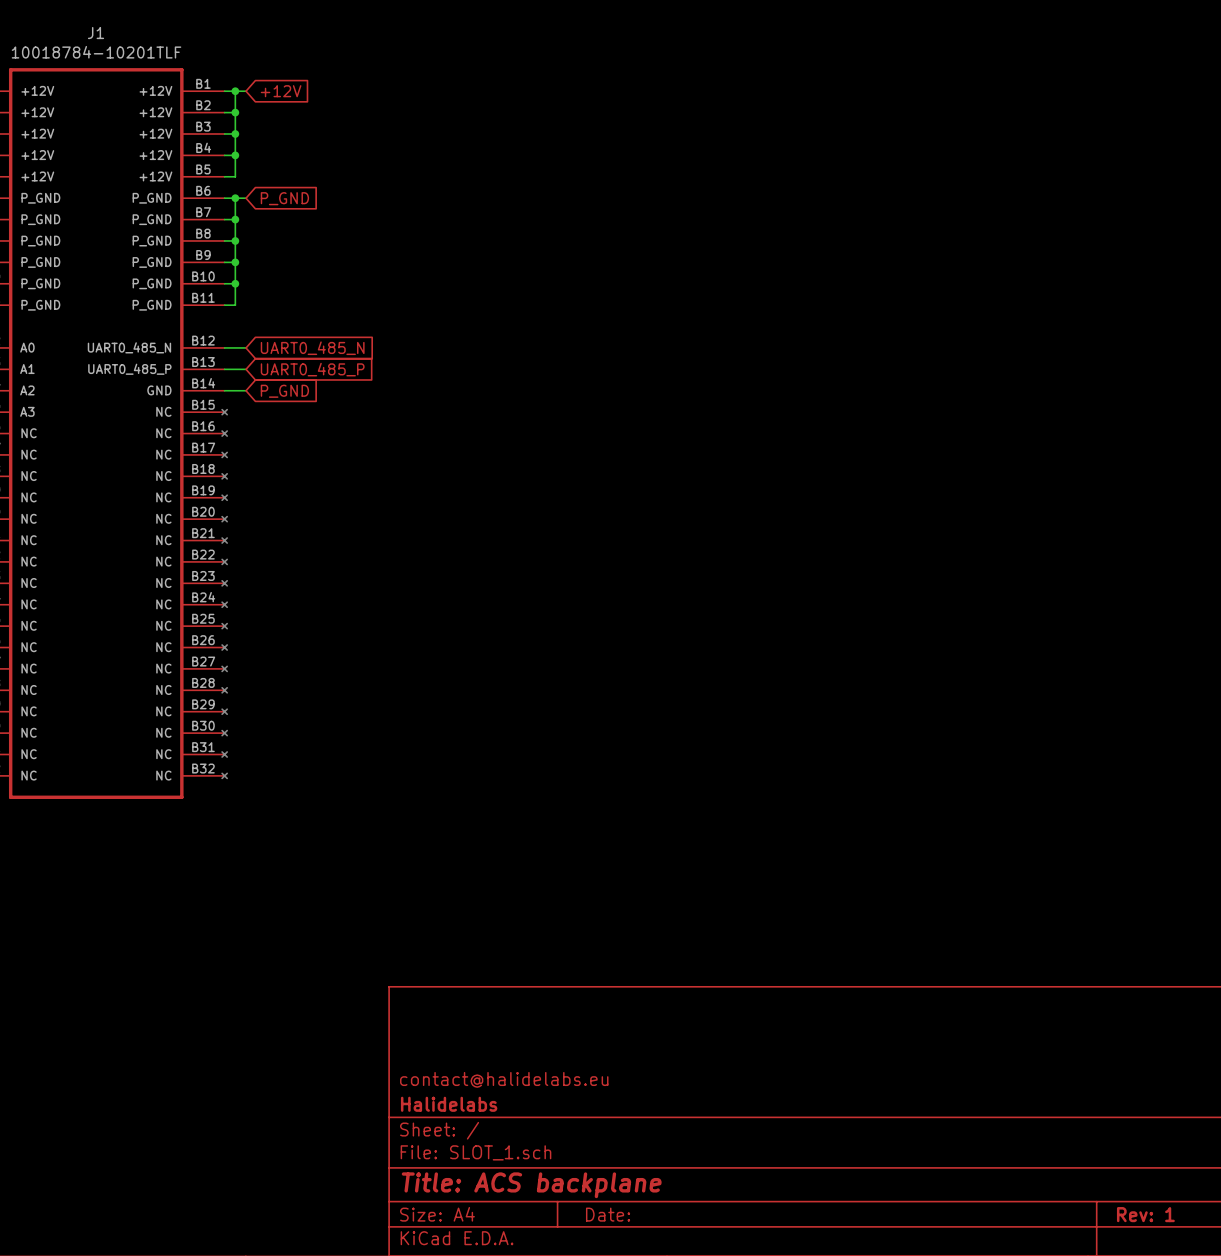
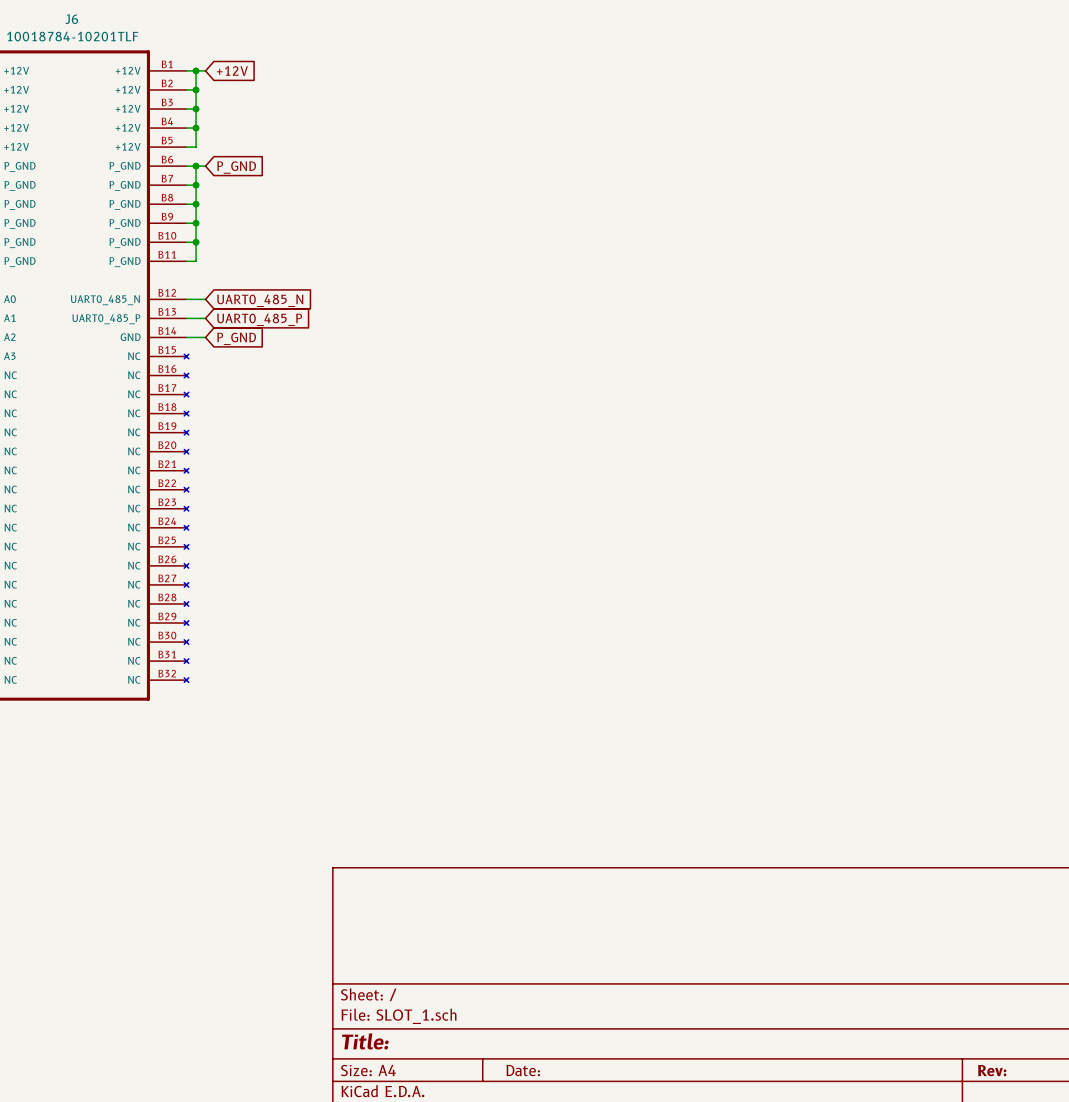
J1 name: J1 (96, 33) -> J6 (71, 19)
title block: contact@halidelabs.eu (504, 1079) -> none
title block: Halidelabs (449, 1104) -> none
title block: Title: ACS backplane (531, 1185) -> Title: (365, 1041)
title block: Rev: 1 (1145, 1214) -> Rev: (992, 1070)

